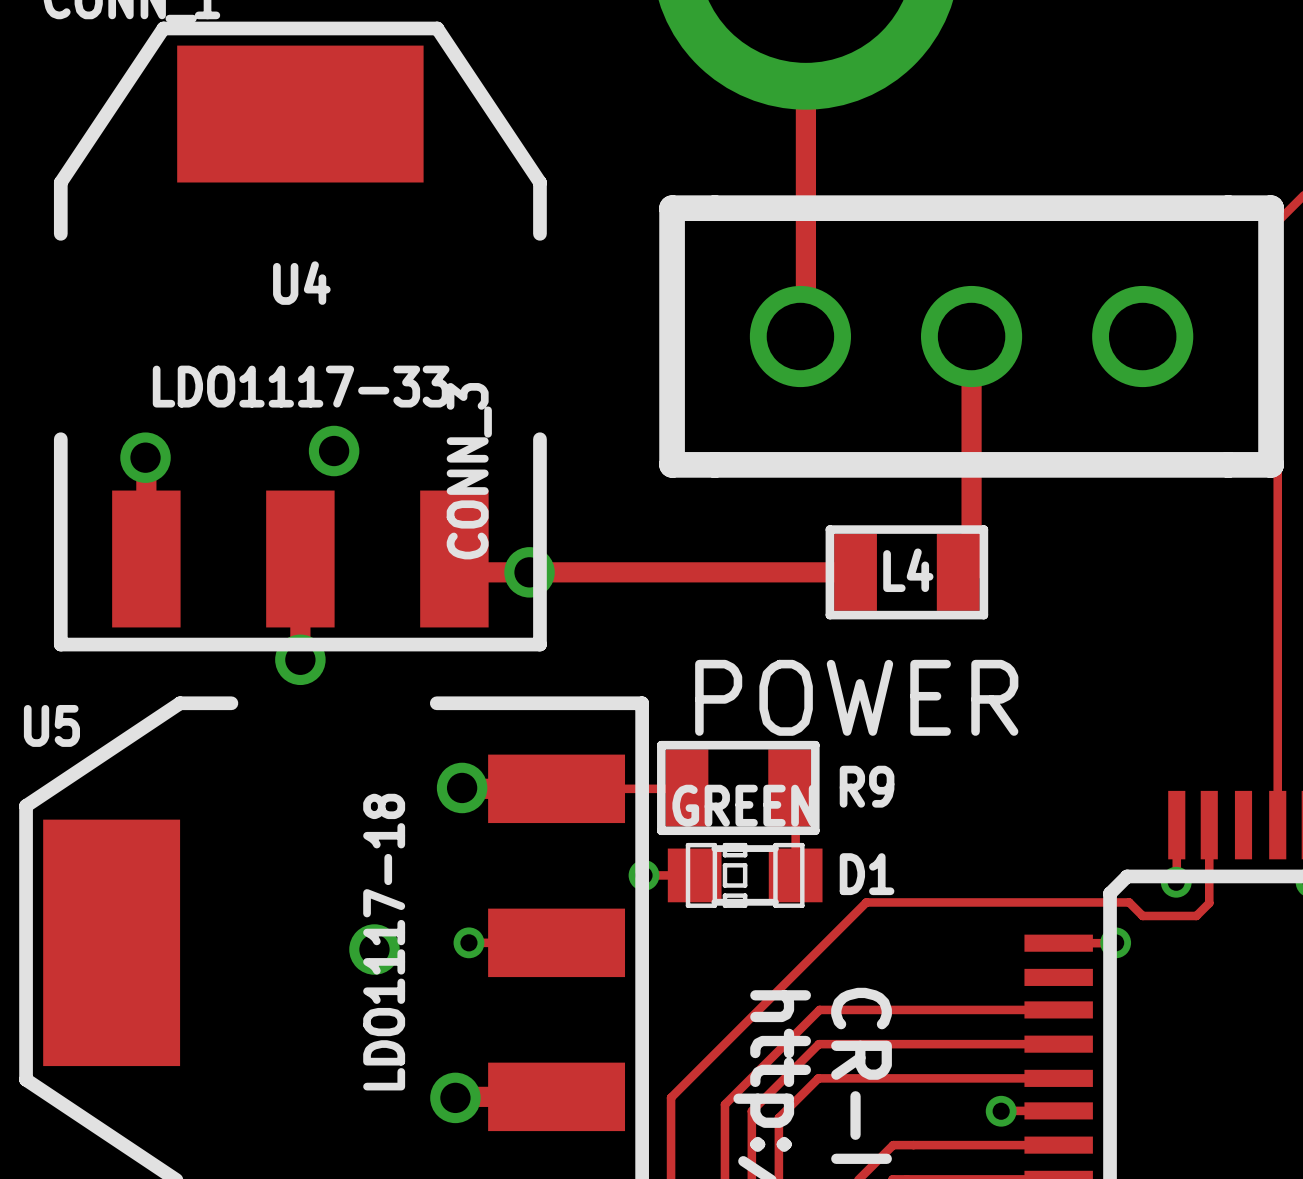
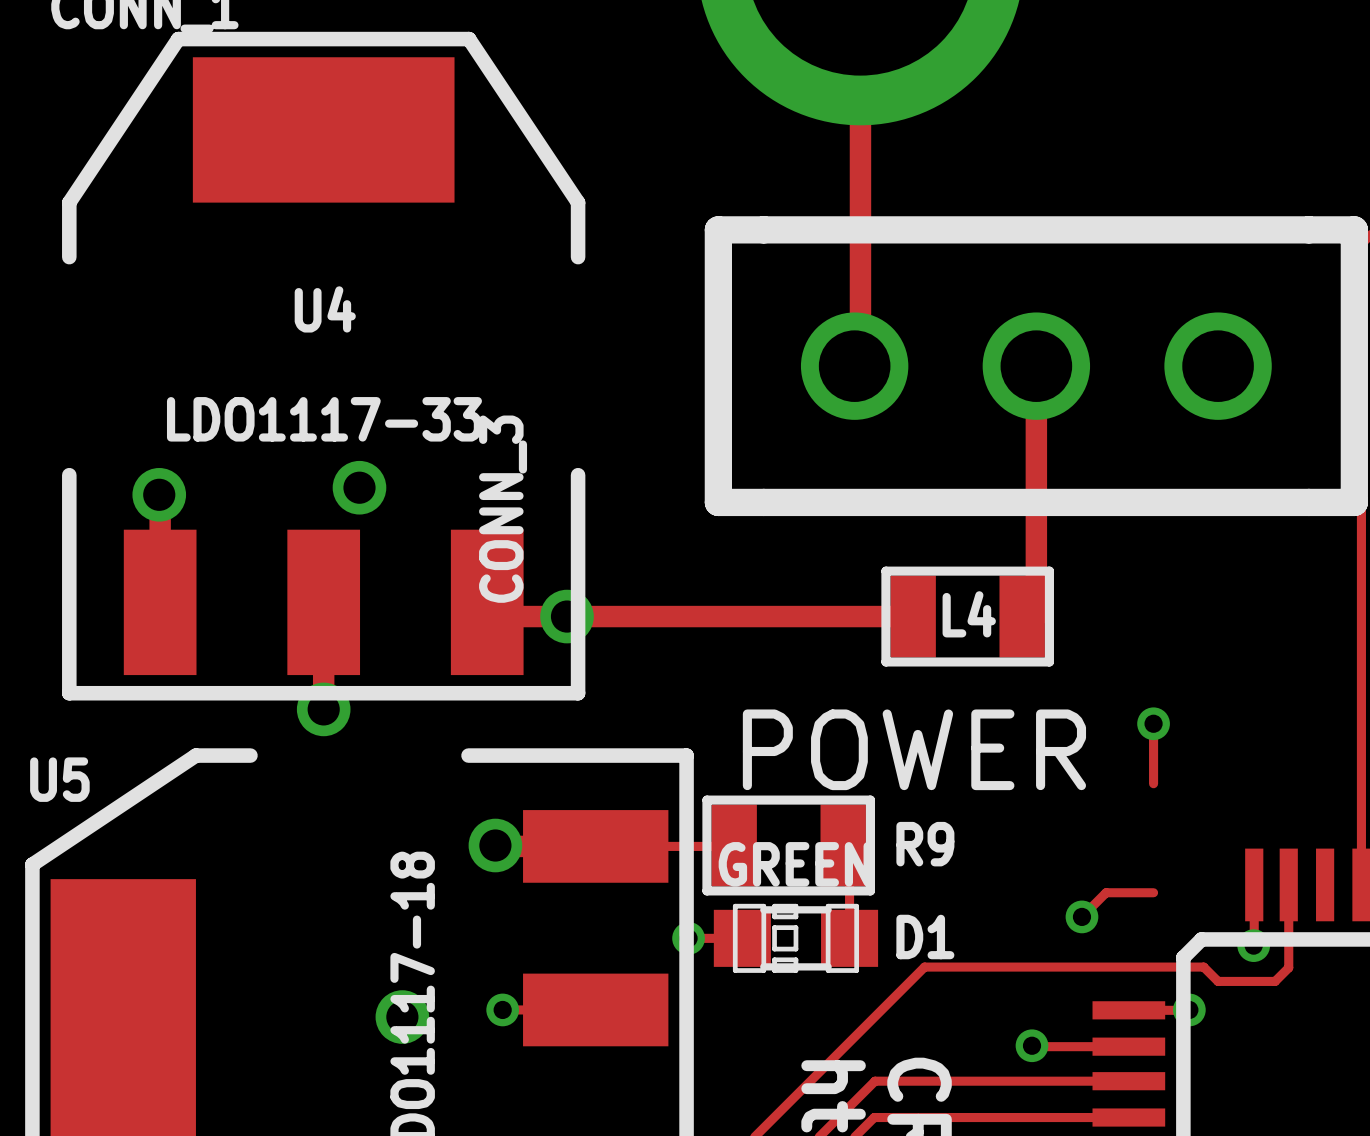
track: none -> (1153, 723) (1153, 783)
via: none -> (1153, 723)
track: none -> (1153, 892) (1106, 892) (1081, 916)
via: none -> (1081, 916)
via: none -> (1032, 1045)
track: none -> (1032, 1046) (1128, 1046)

